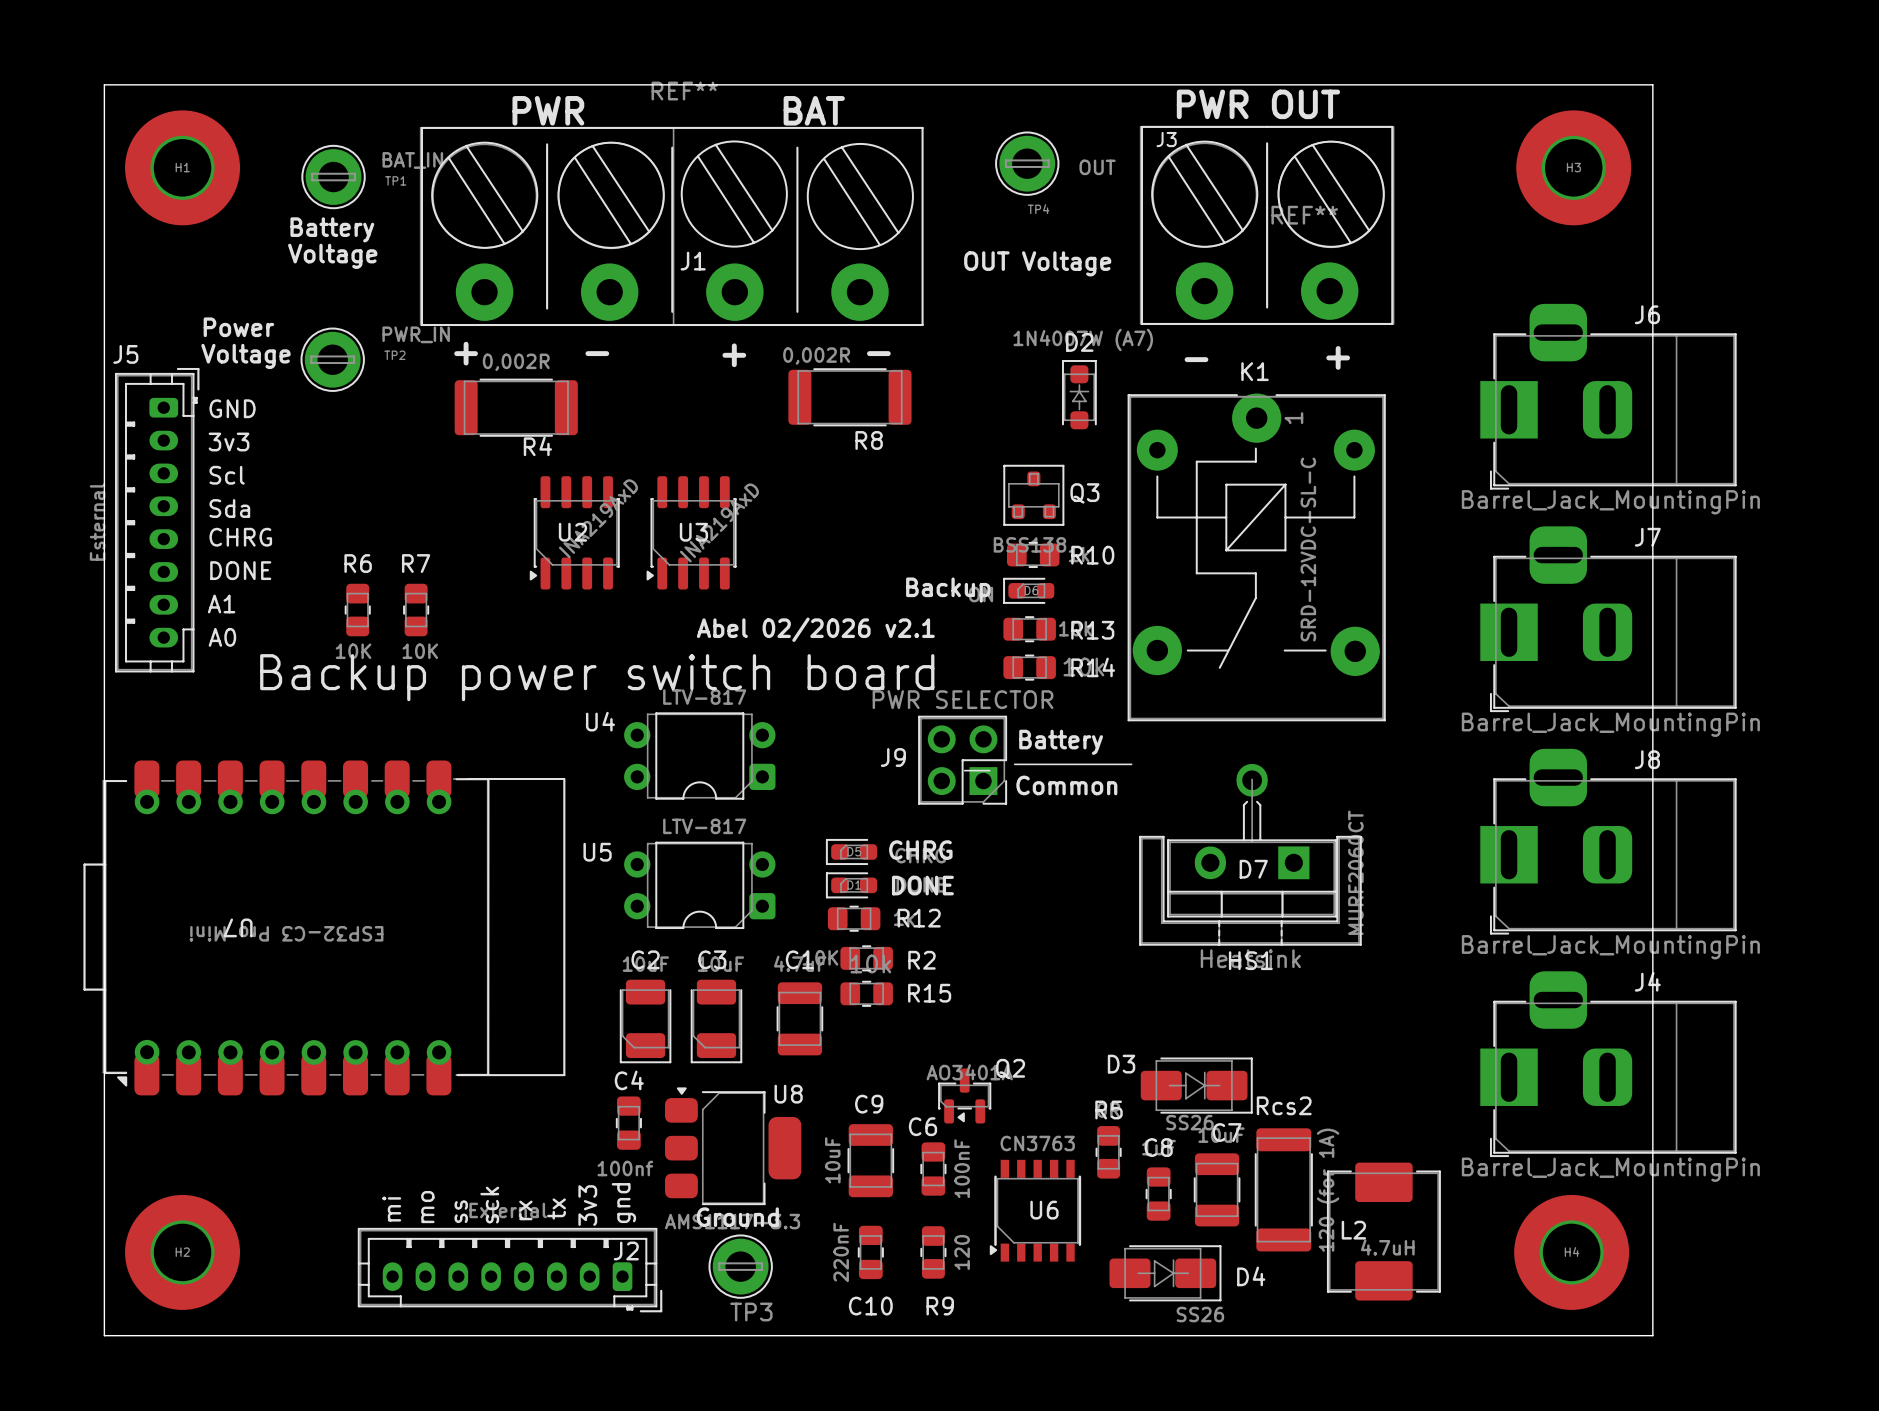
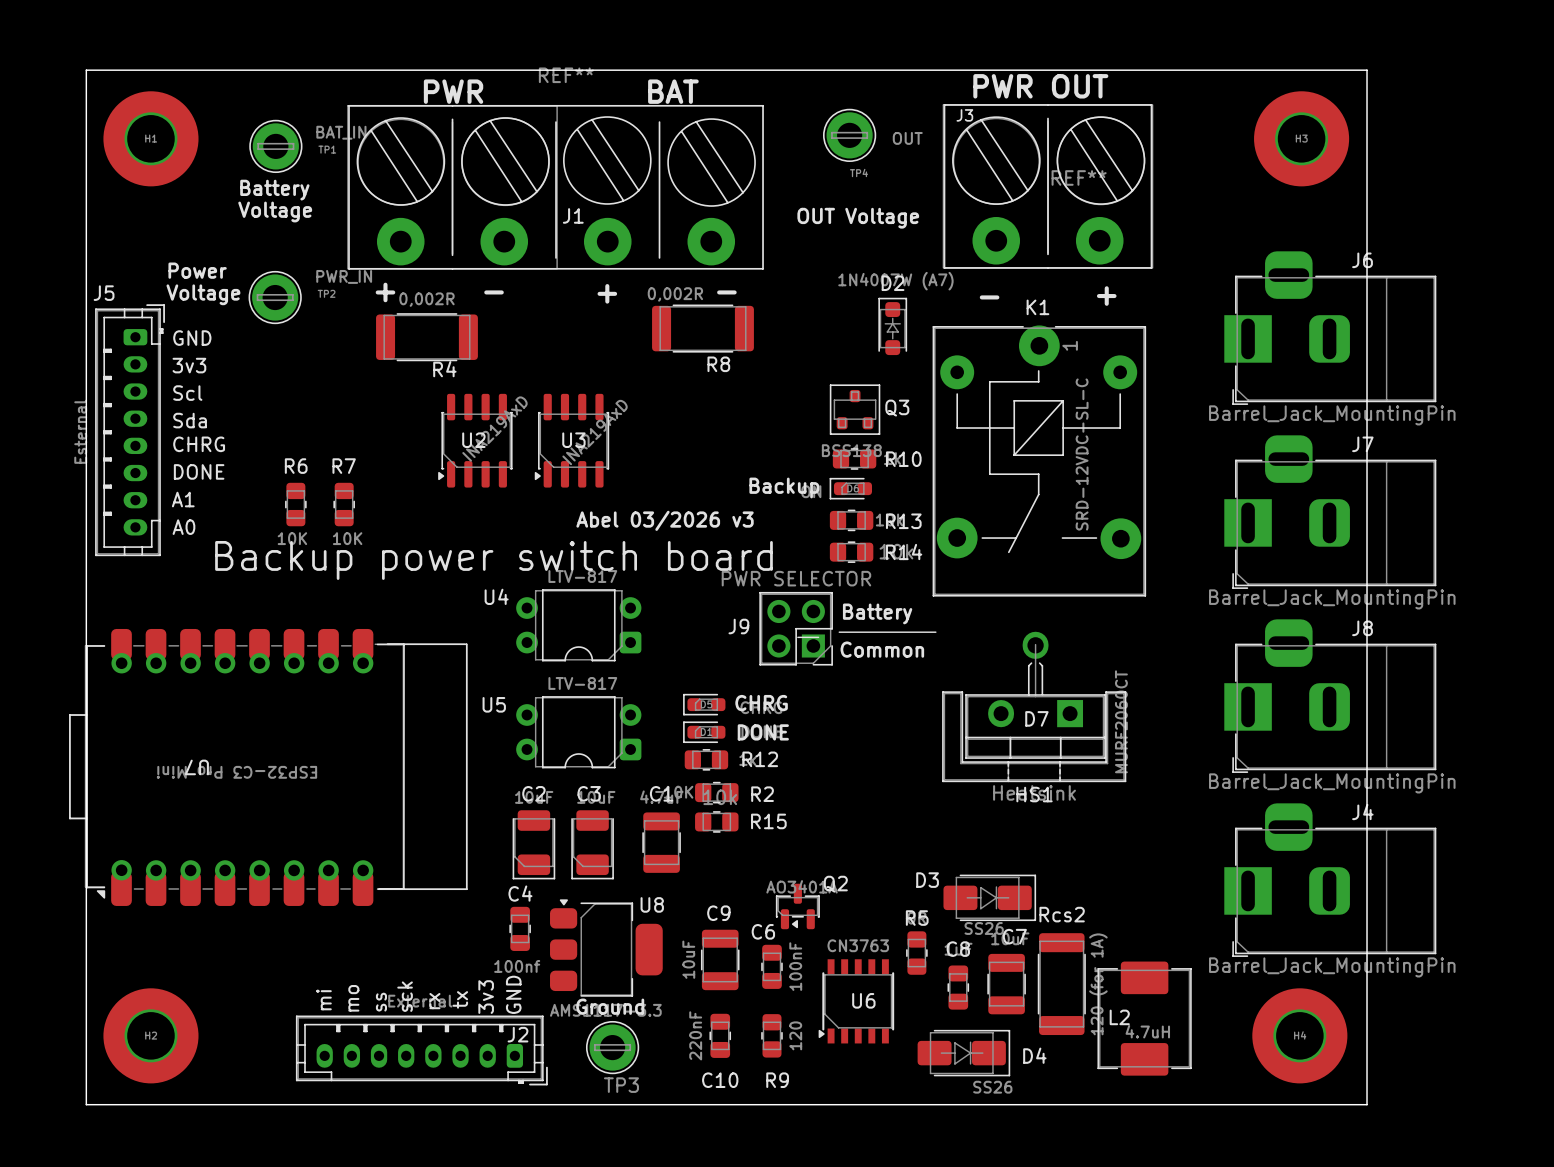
text: Abel 02/2026 v2.1 (815, 629) -> Abel 03/2026 v3 (665, 520)
text: gnd (623, 1203) -> GND (513, 994)

